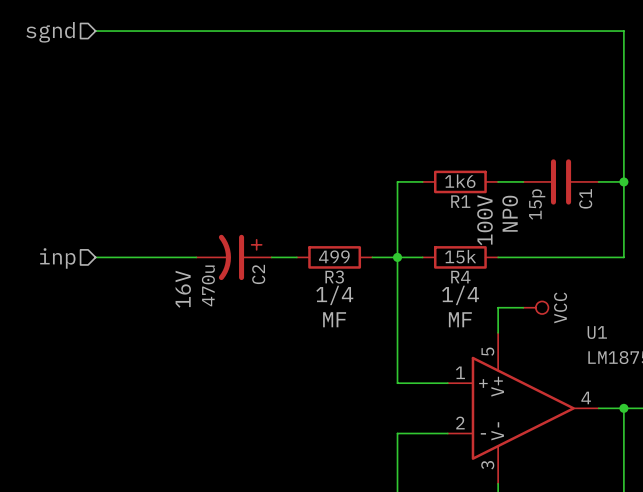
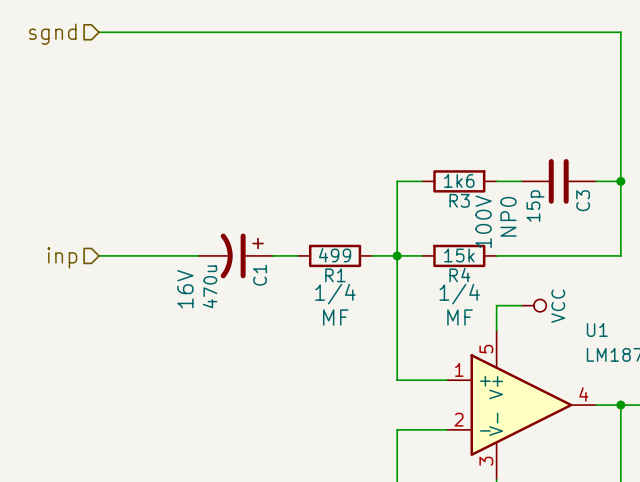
C1 name: C1 (585, 198) -> C3 (583, 200)
R1 name: R1 (460, 201) -> R3 (459, 200)
C2 name: C2 (258, 274) -> C1 (260, 275)
R3 name: R3 (334, 277) -> R1 (335, 275)

